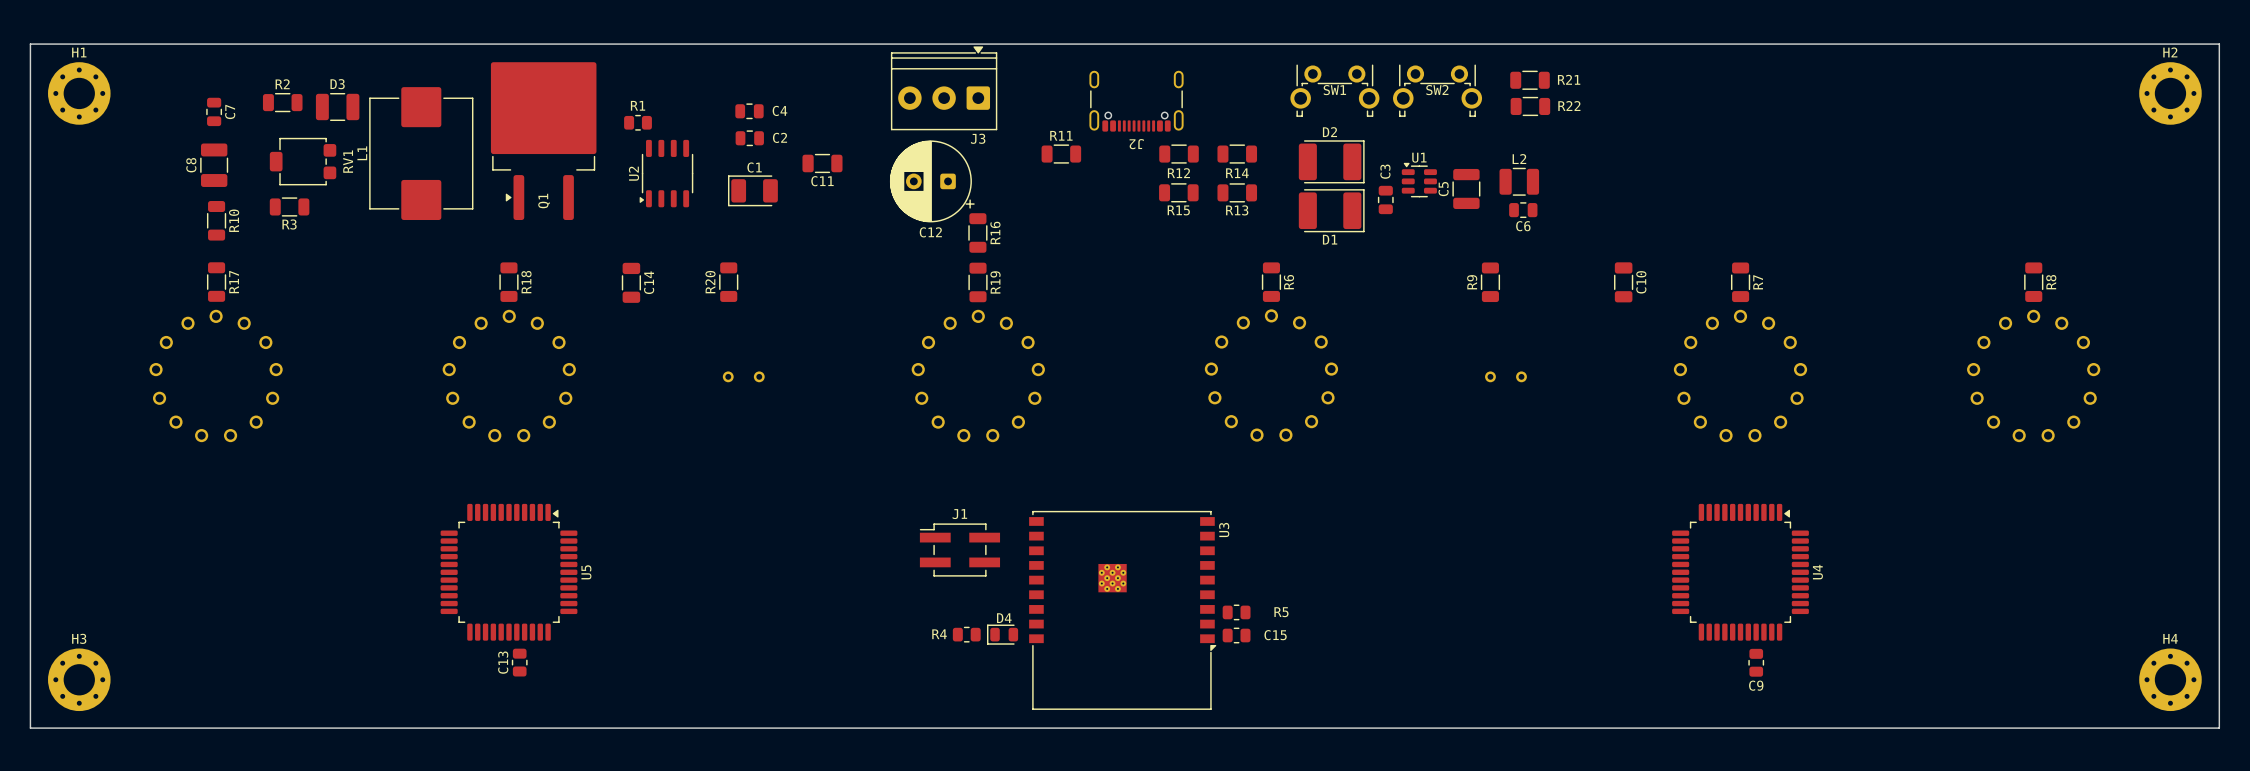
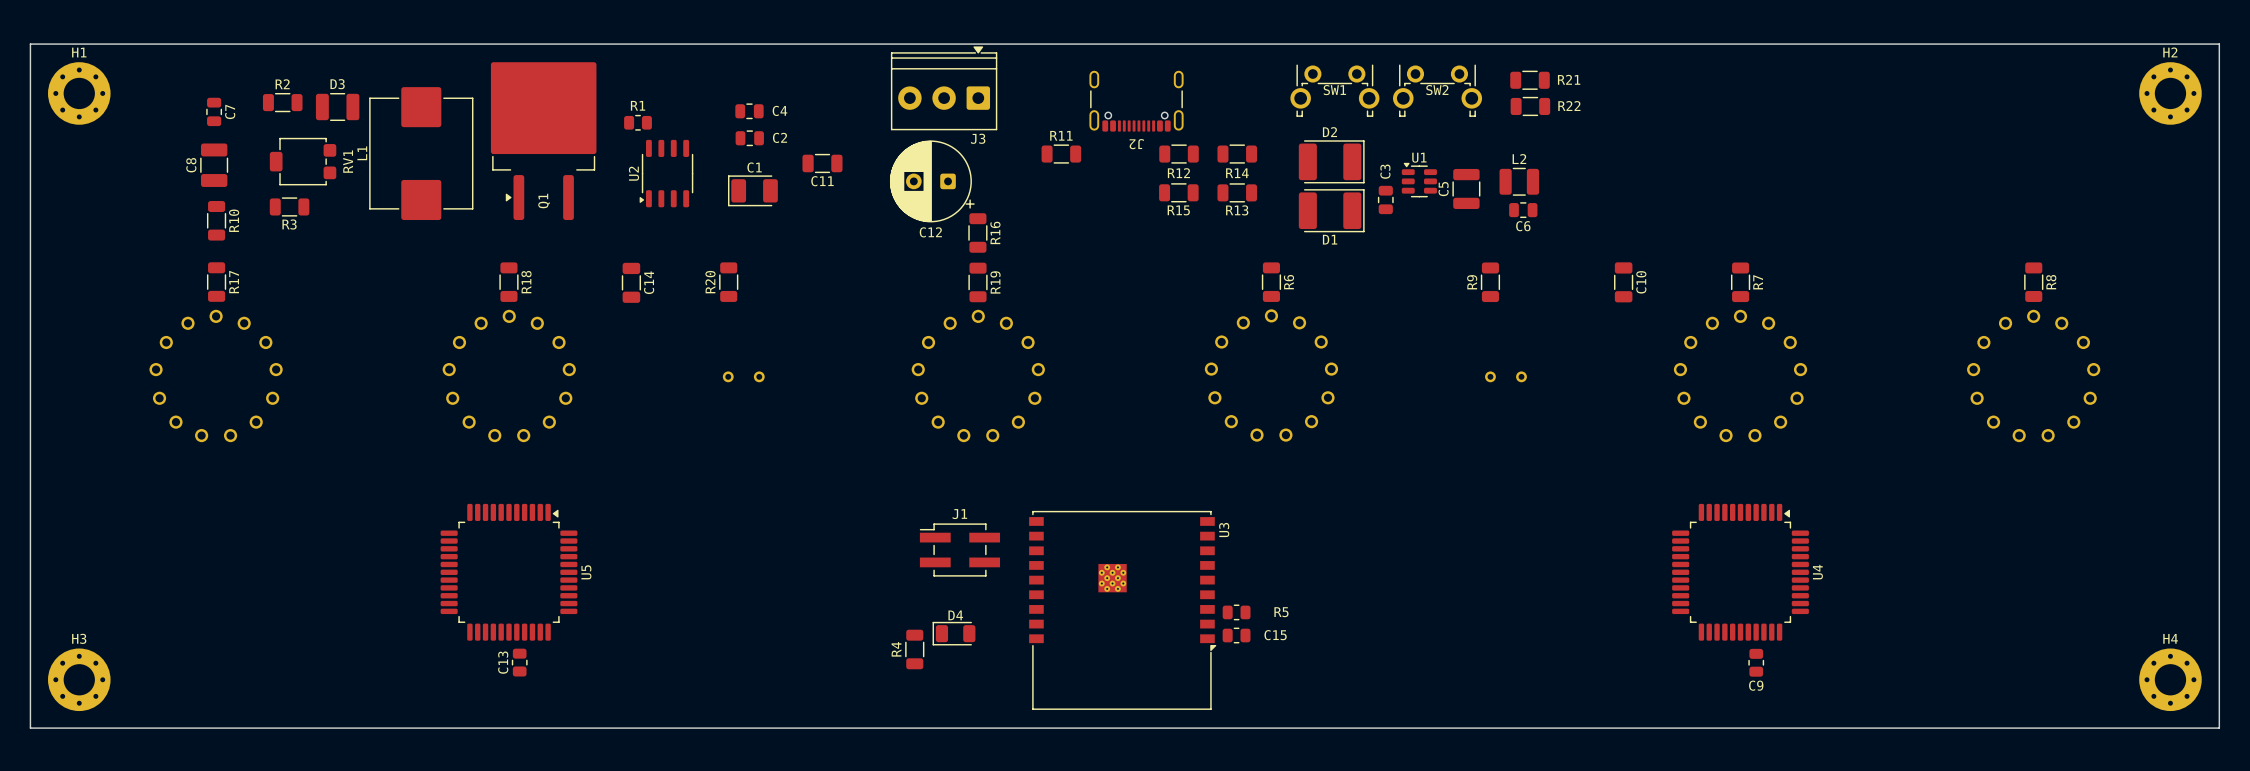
D4 footprint: [987, 624, 1019, 645] -> [932, 621, 976, 646]
R4 footprint: [952, 626, 981, 643] -> [905, 629, 925, 670]

